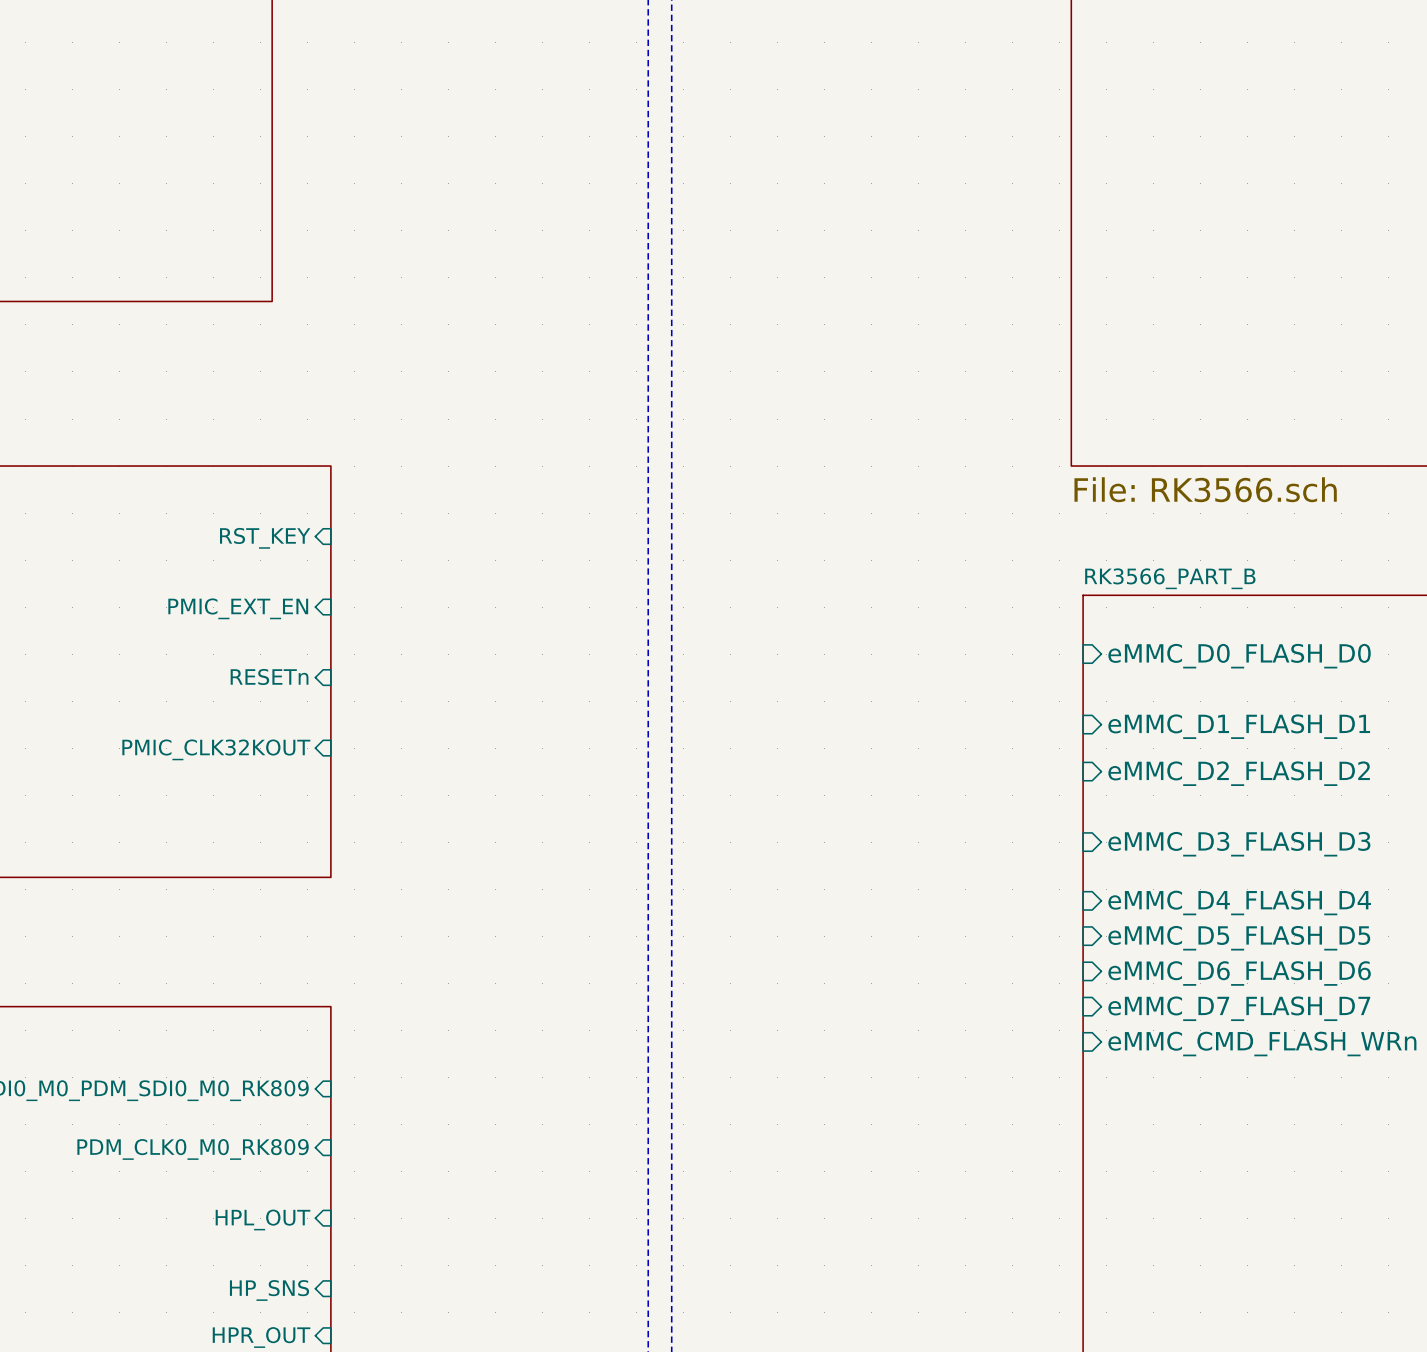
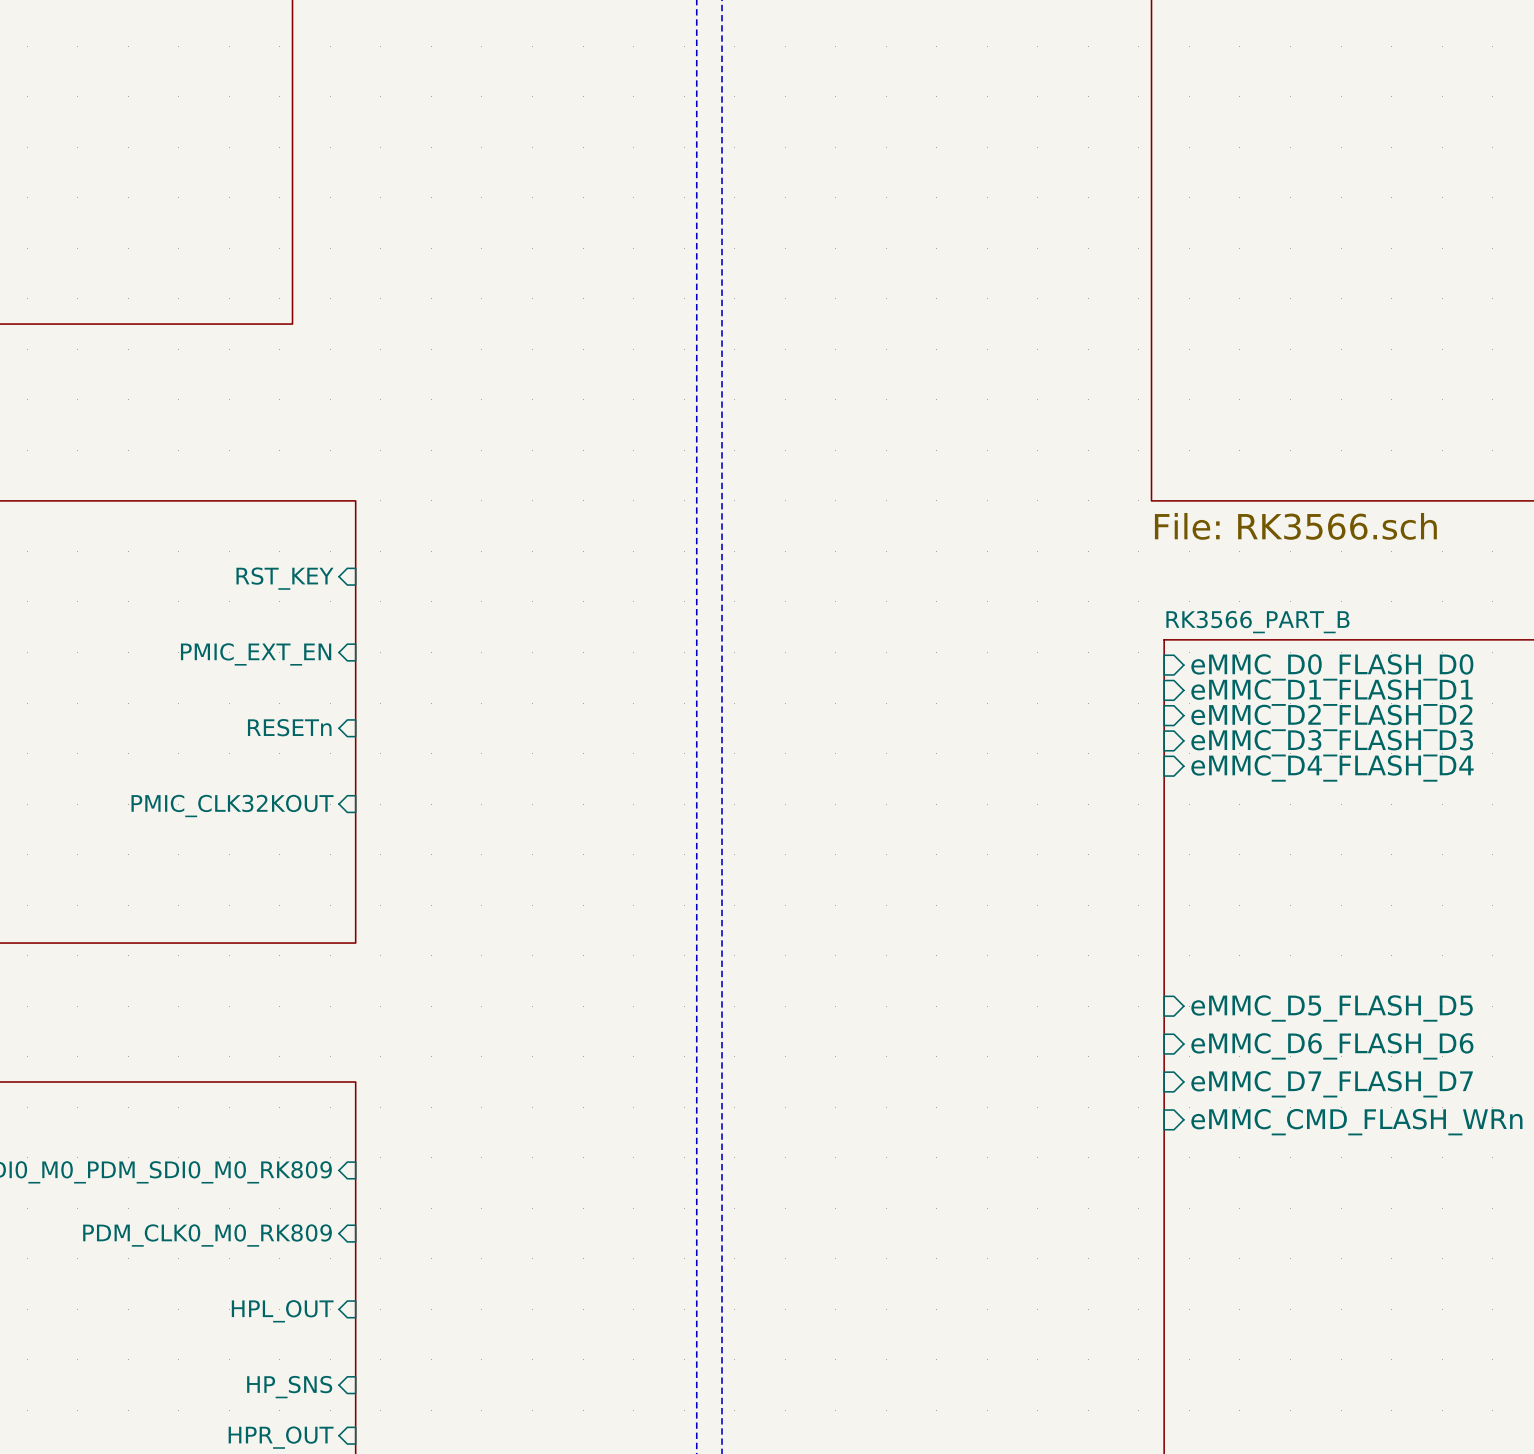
sheet pin position: eMMC_D0_FLASH_D0 (1239, 656) -> eMMC_D0_FLASH_D0 (1332, 667)
sheet pin position: eMMC_D1_FLASH_D1 (1239, 726) -> eMMC_D1_FLASH_D1 (1331, 692)
sheet pin position: eMMC_D2_FLASH_D2 (1239, 773) -> eMMC_D2_FLASH_D2 (1331, 717)
sheet pin position: eMMC_D3_FLASH_D3 (1239, 844) -> eMMC_D3_FLASH_D3 (1332, 743)
sheet pin position: eMMC_D4_FLASH_D4 (1239, 902) -> eMMC_D4_FLASH_D4 (1332, 768)

